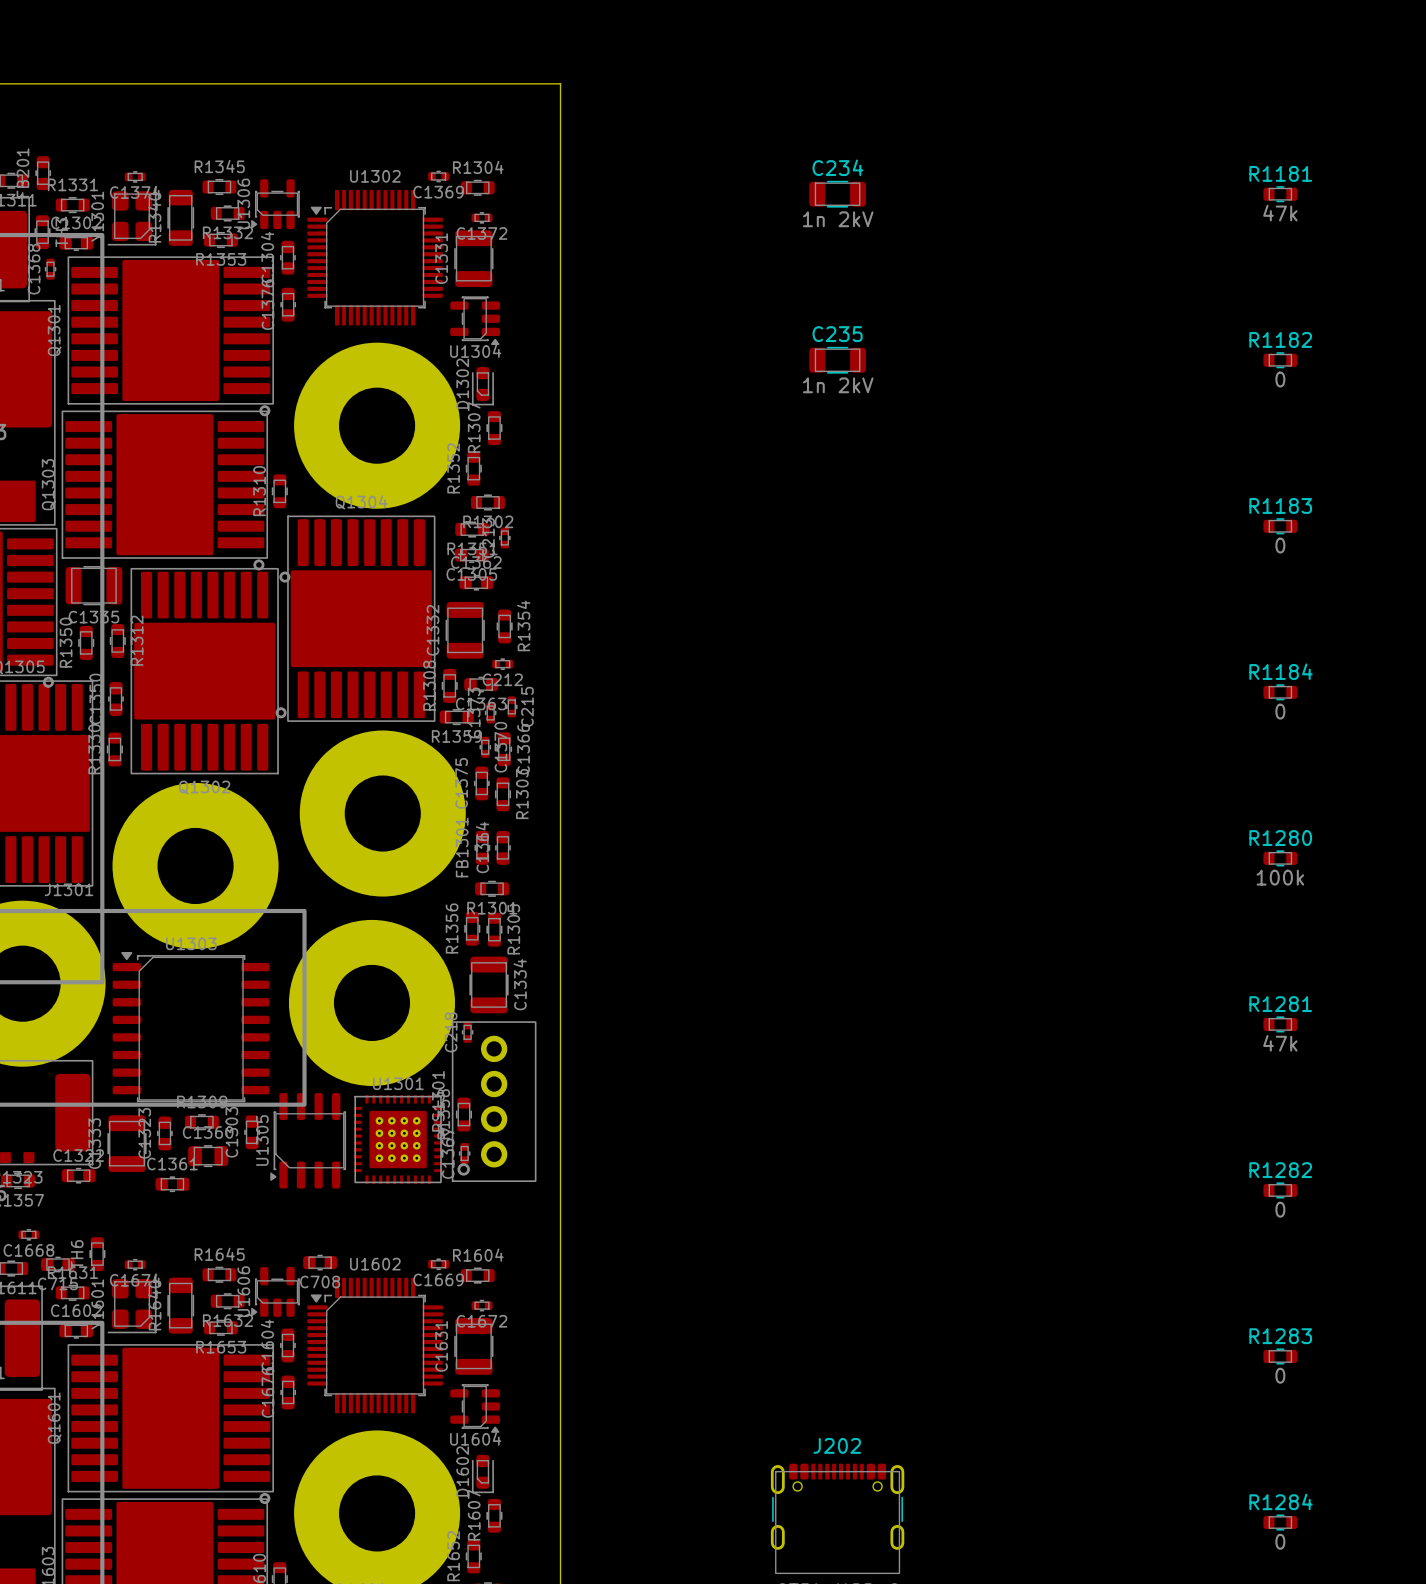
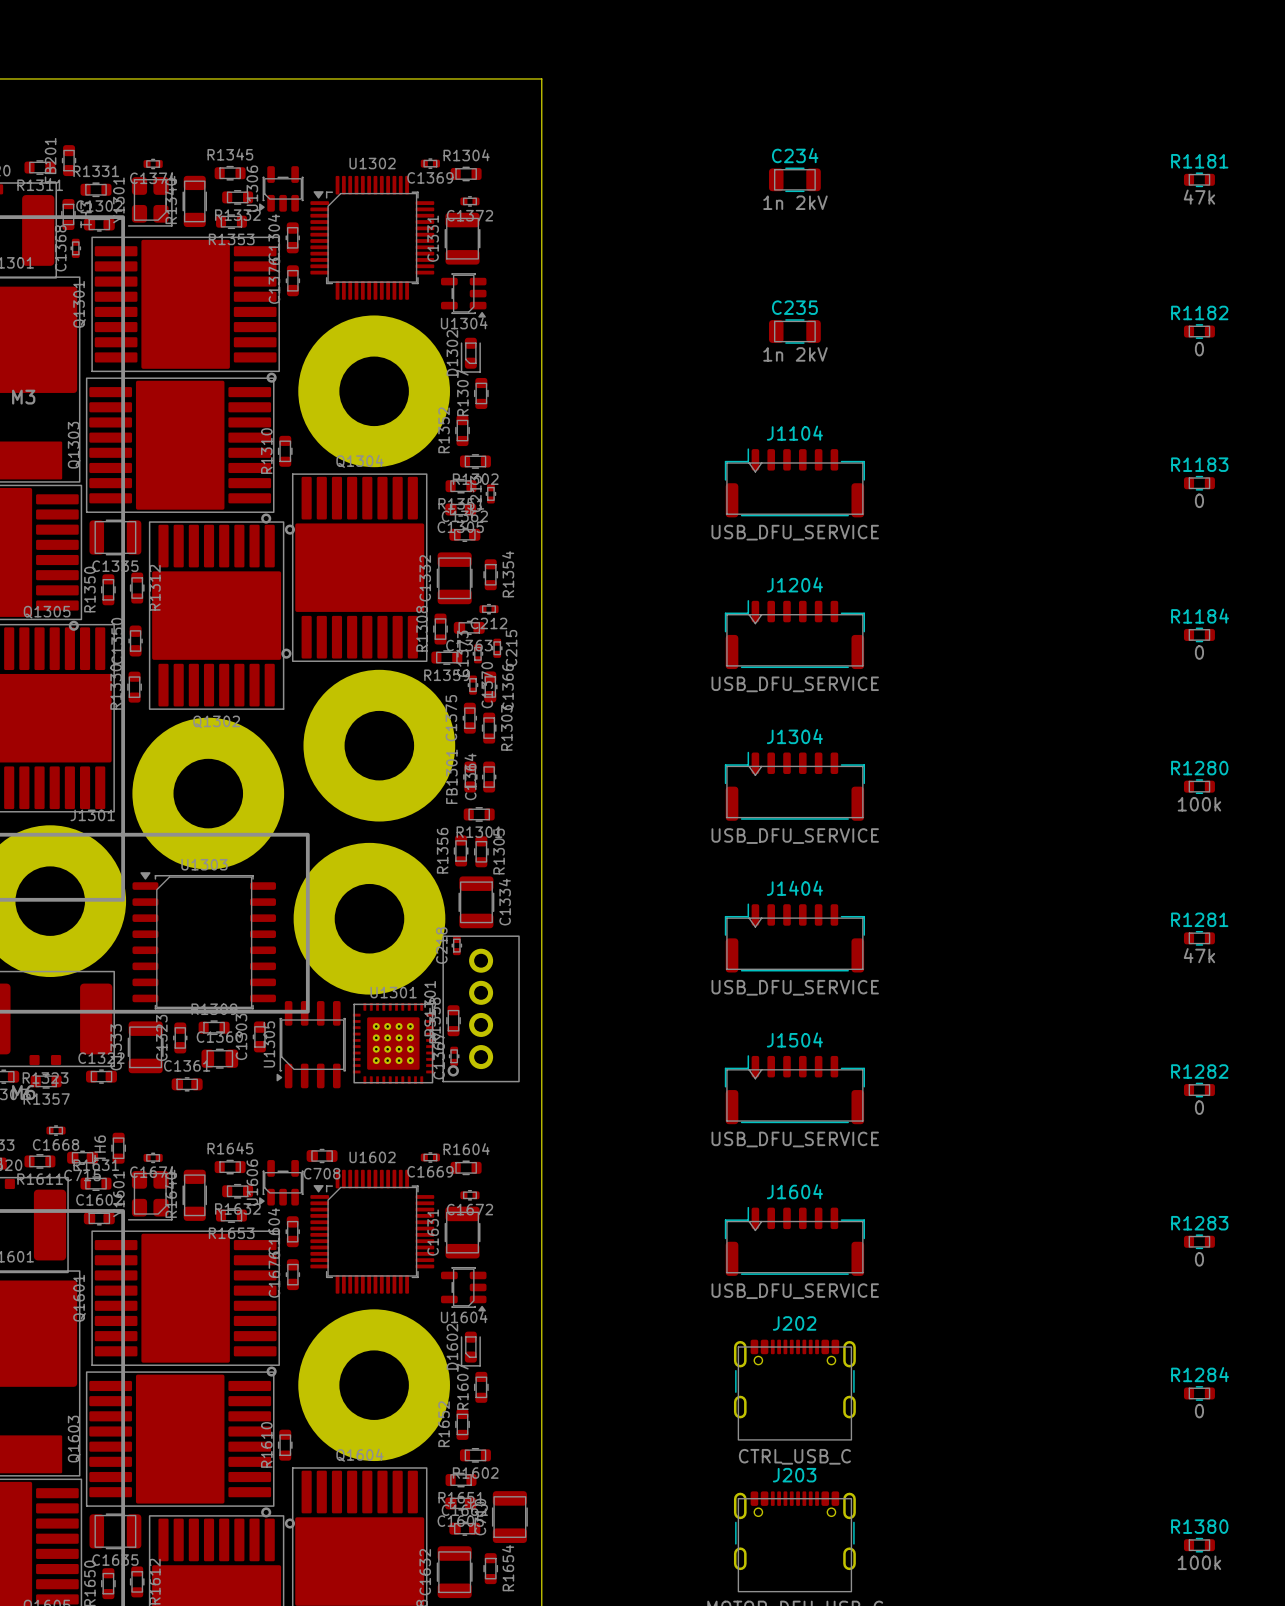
J1104: none -> USB_DFU_SERVICE (794, 482)
J1204: none -> USB_DFU_SERVICE (794, 634)
J1304: none -> USB_DFU_SERVICE (794, 786)
J1404: none -> USB_DFU_SERVICE (794, 937)
J1504: none -> USB_DFU_SERVICE (794, 1089)
J1604: none -> USB_DFU_SERVICE (794, 1241)

